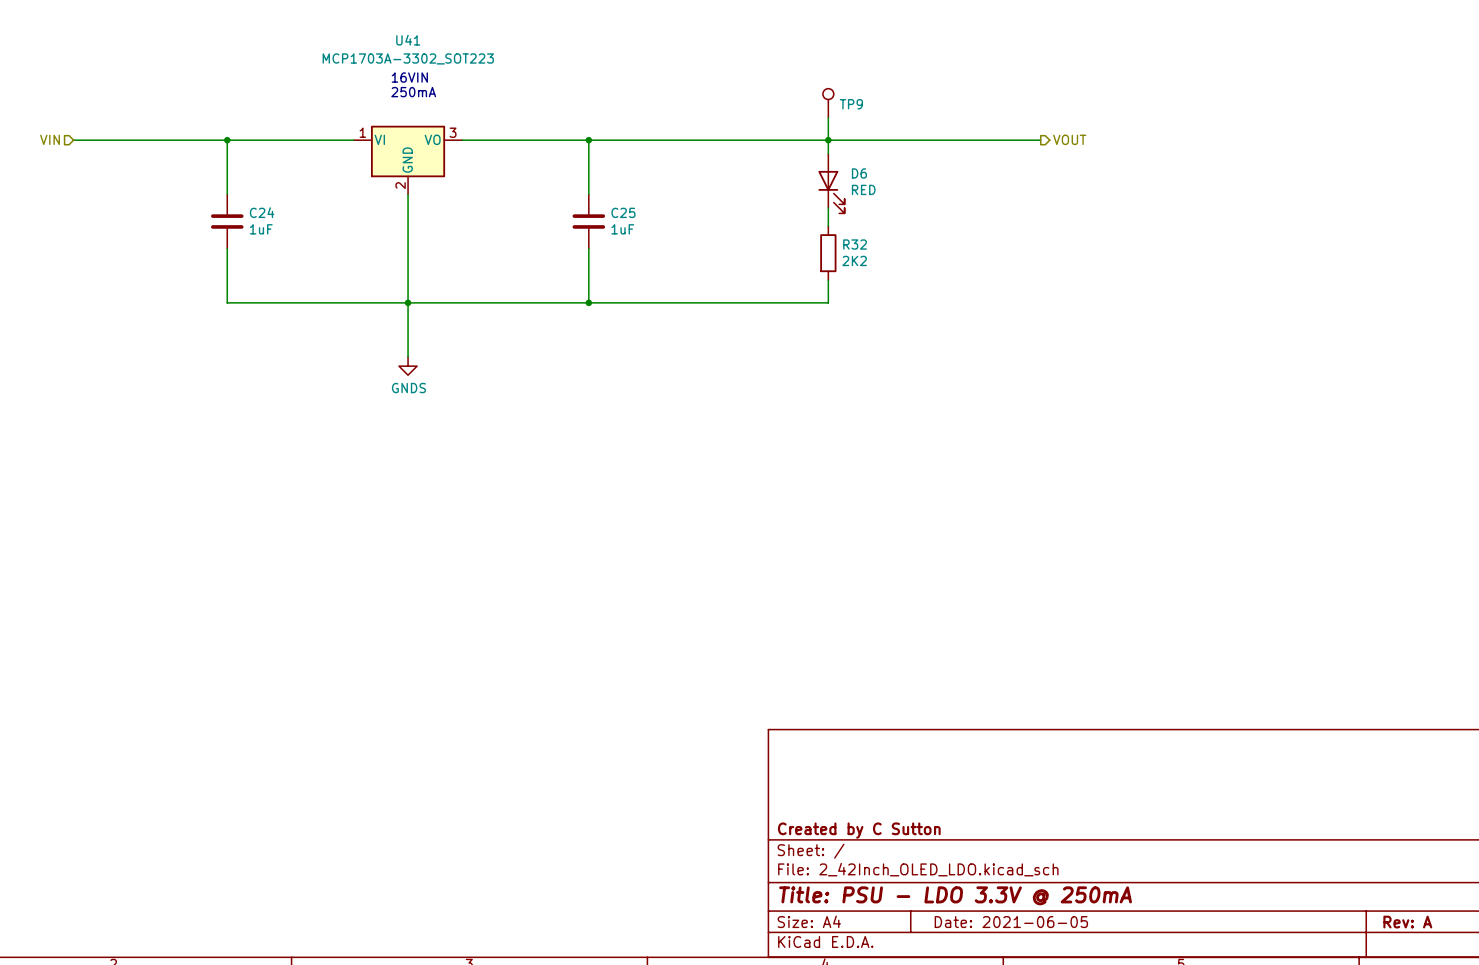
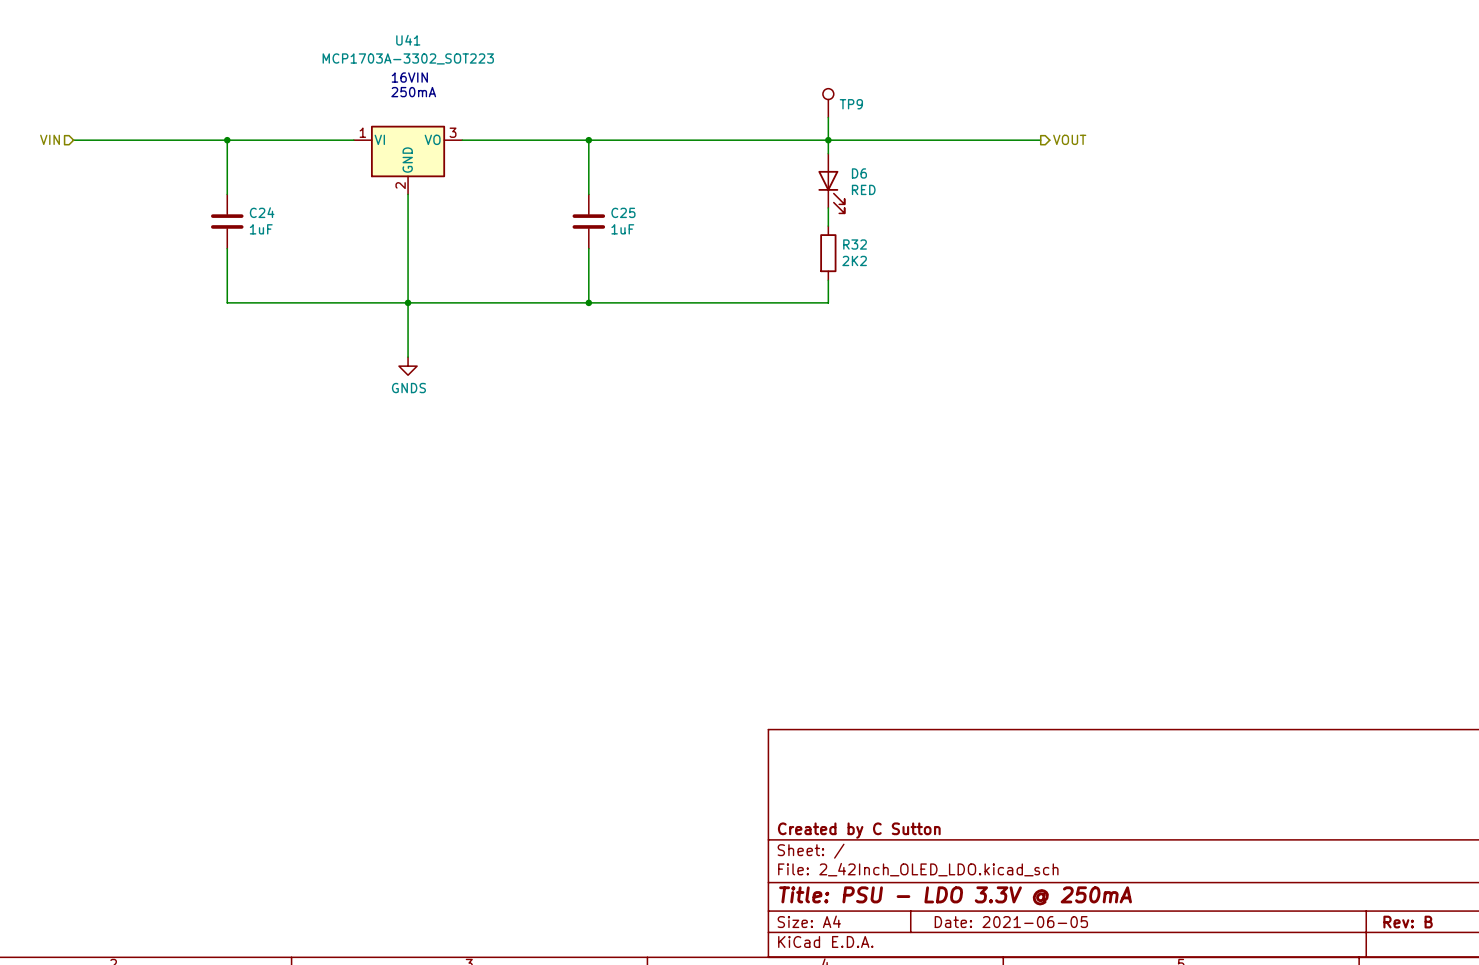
title block: Rev: A (1407, 922) -> Rev: B (1408, 922)

